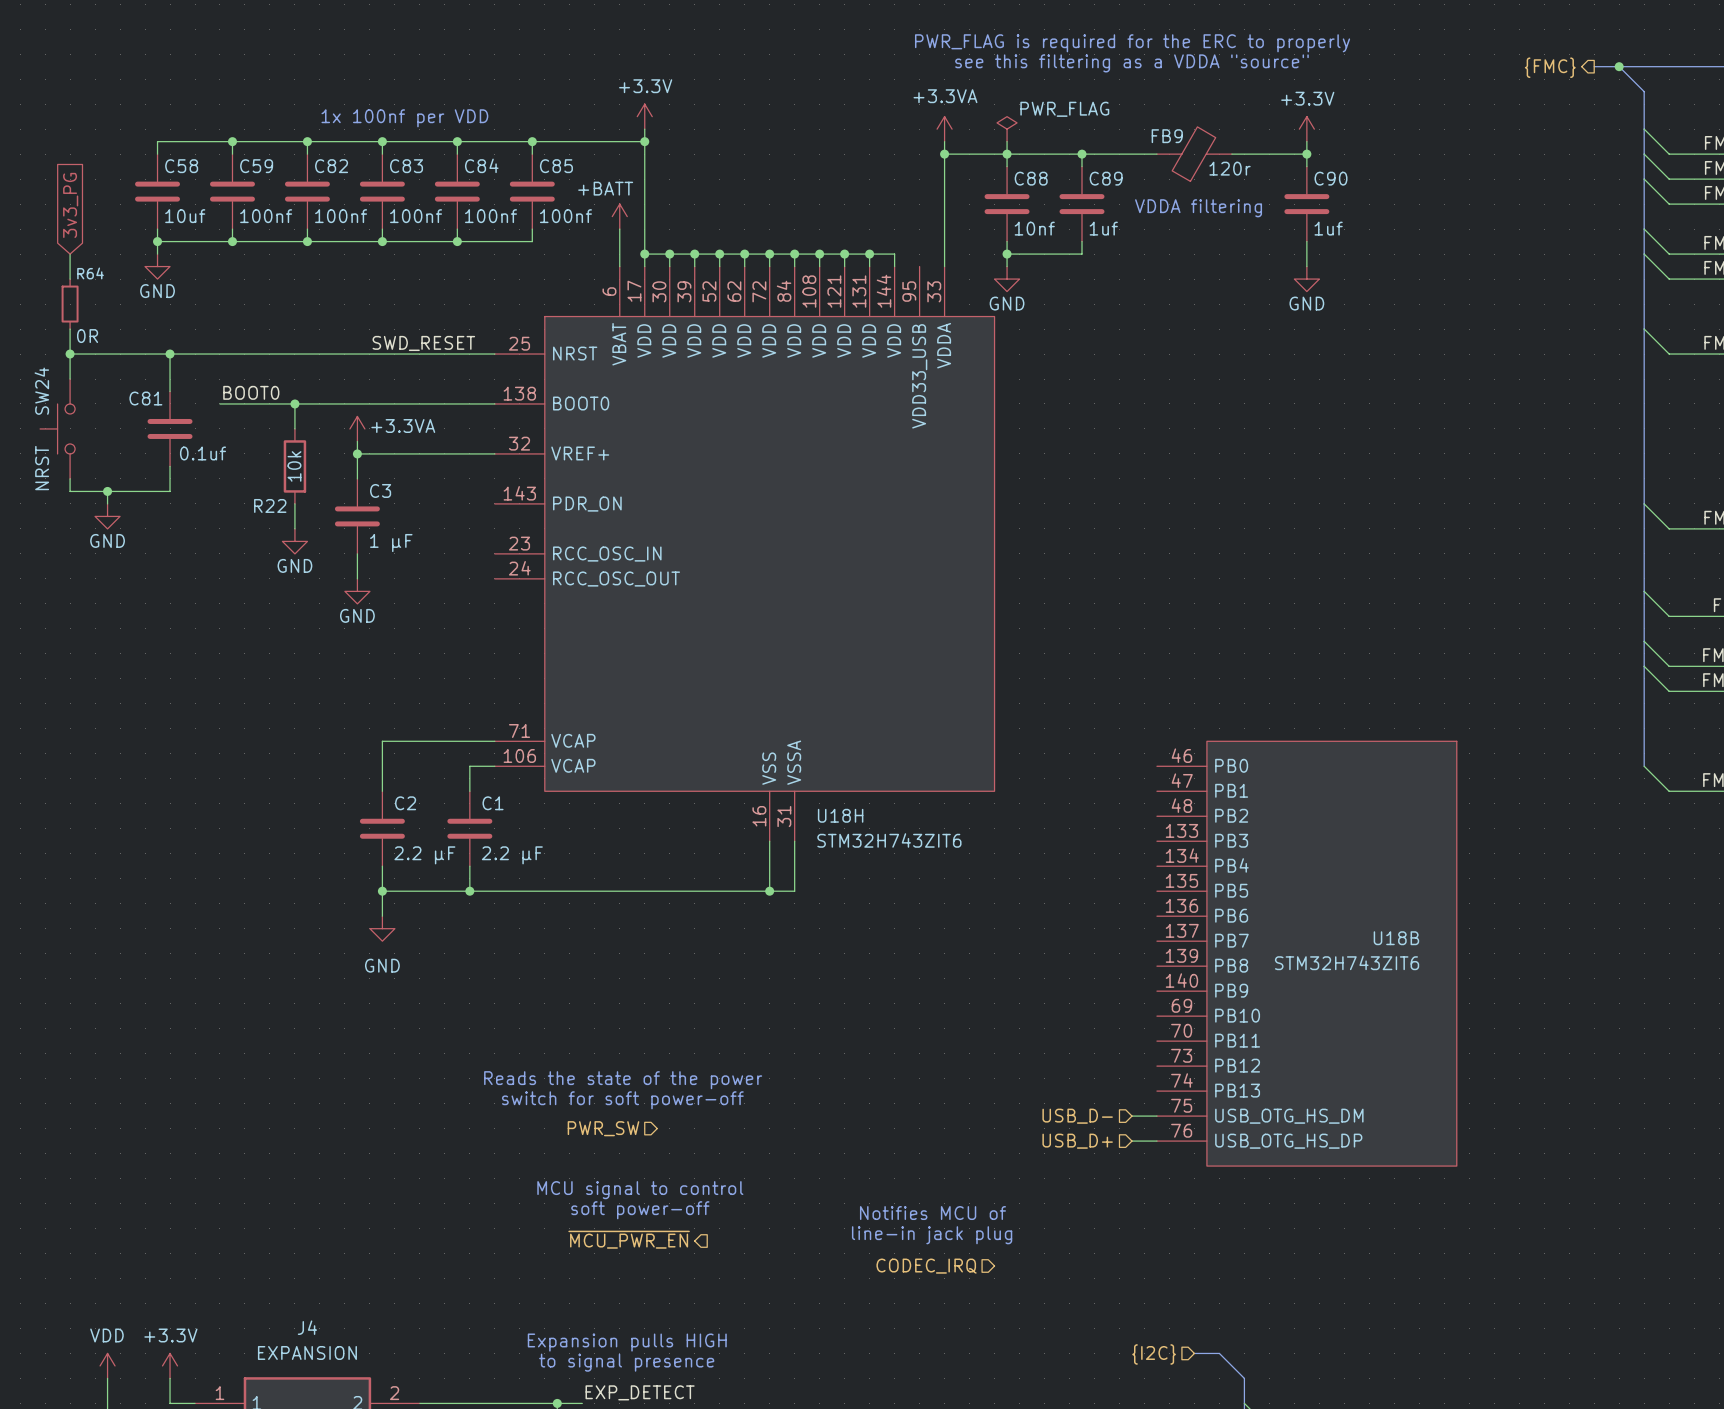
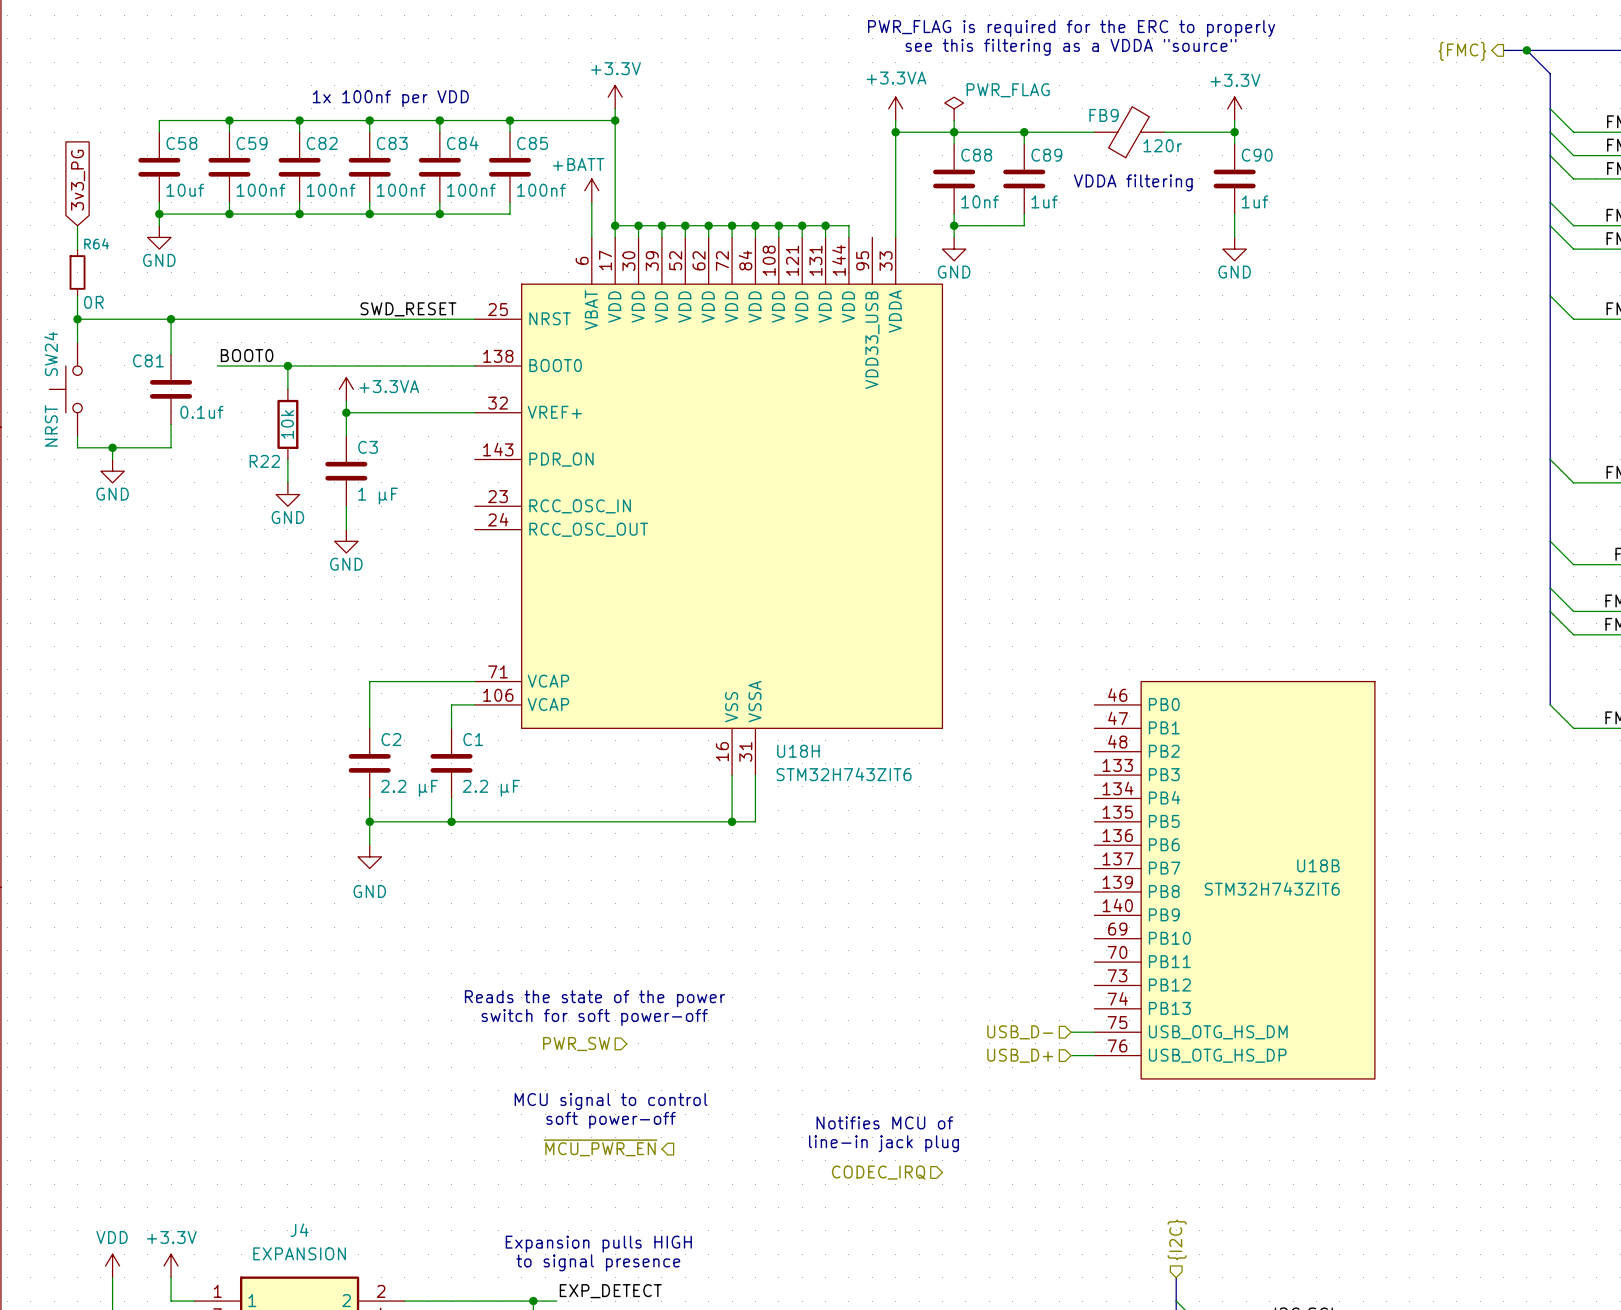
bus: (1194, 1353) (1219, 1353) (1244, 1378) -> none
hierarchical label rotation: 0° (1154, 1354) -> 90° clockwise (1177, 1239)
hierarchical label position: {I2C} (1154, 1354) -> {I2C} (1177, 1239)

